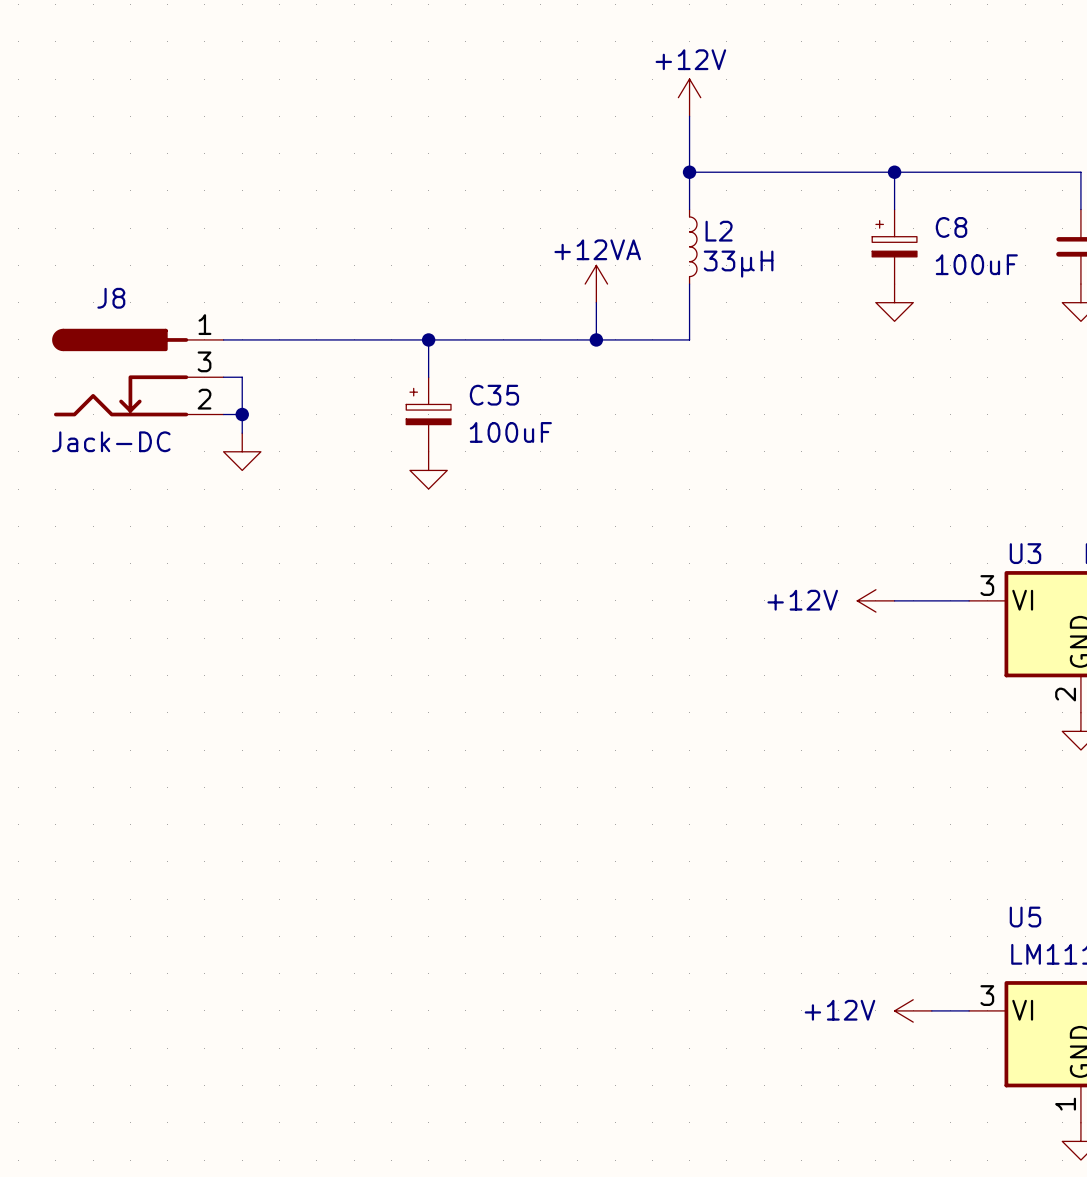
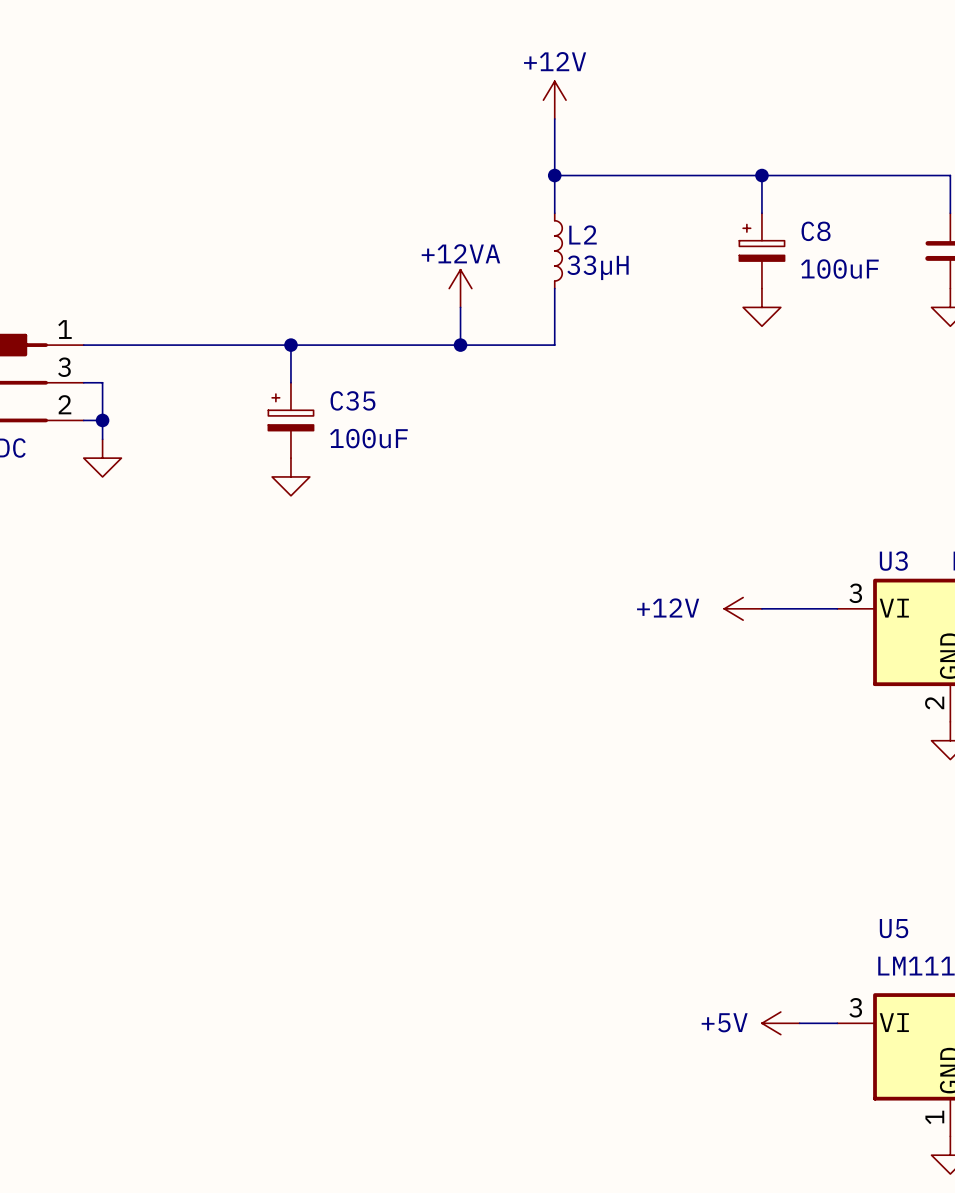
power symbol: +12V (913, 1010) -> +5V (780, 1023)

